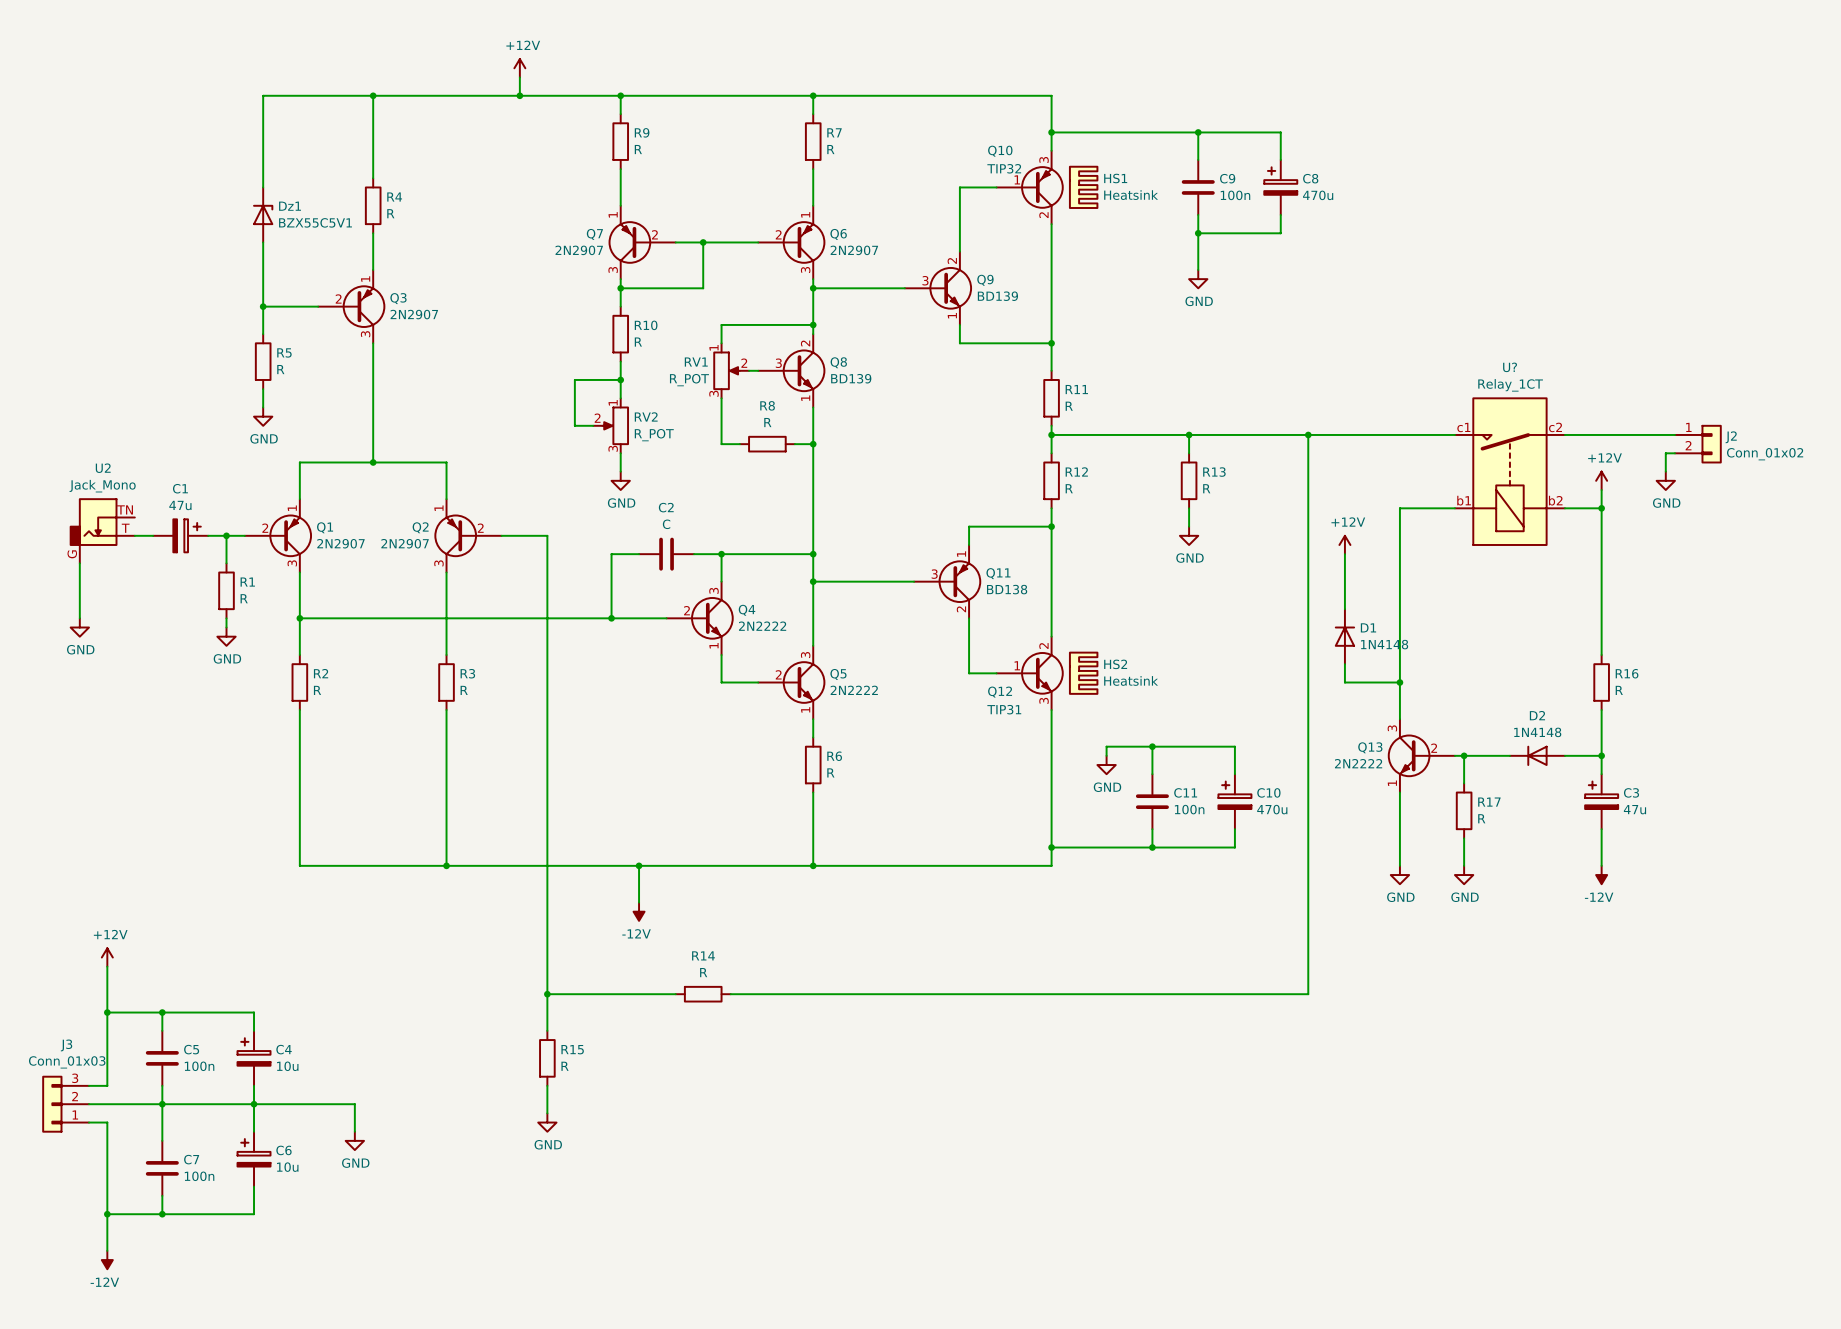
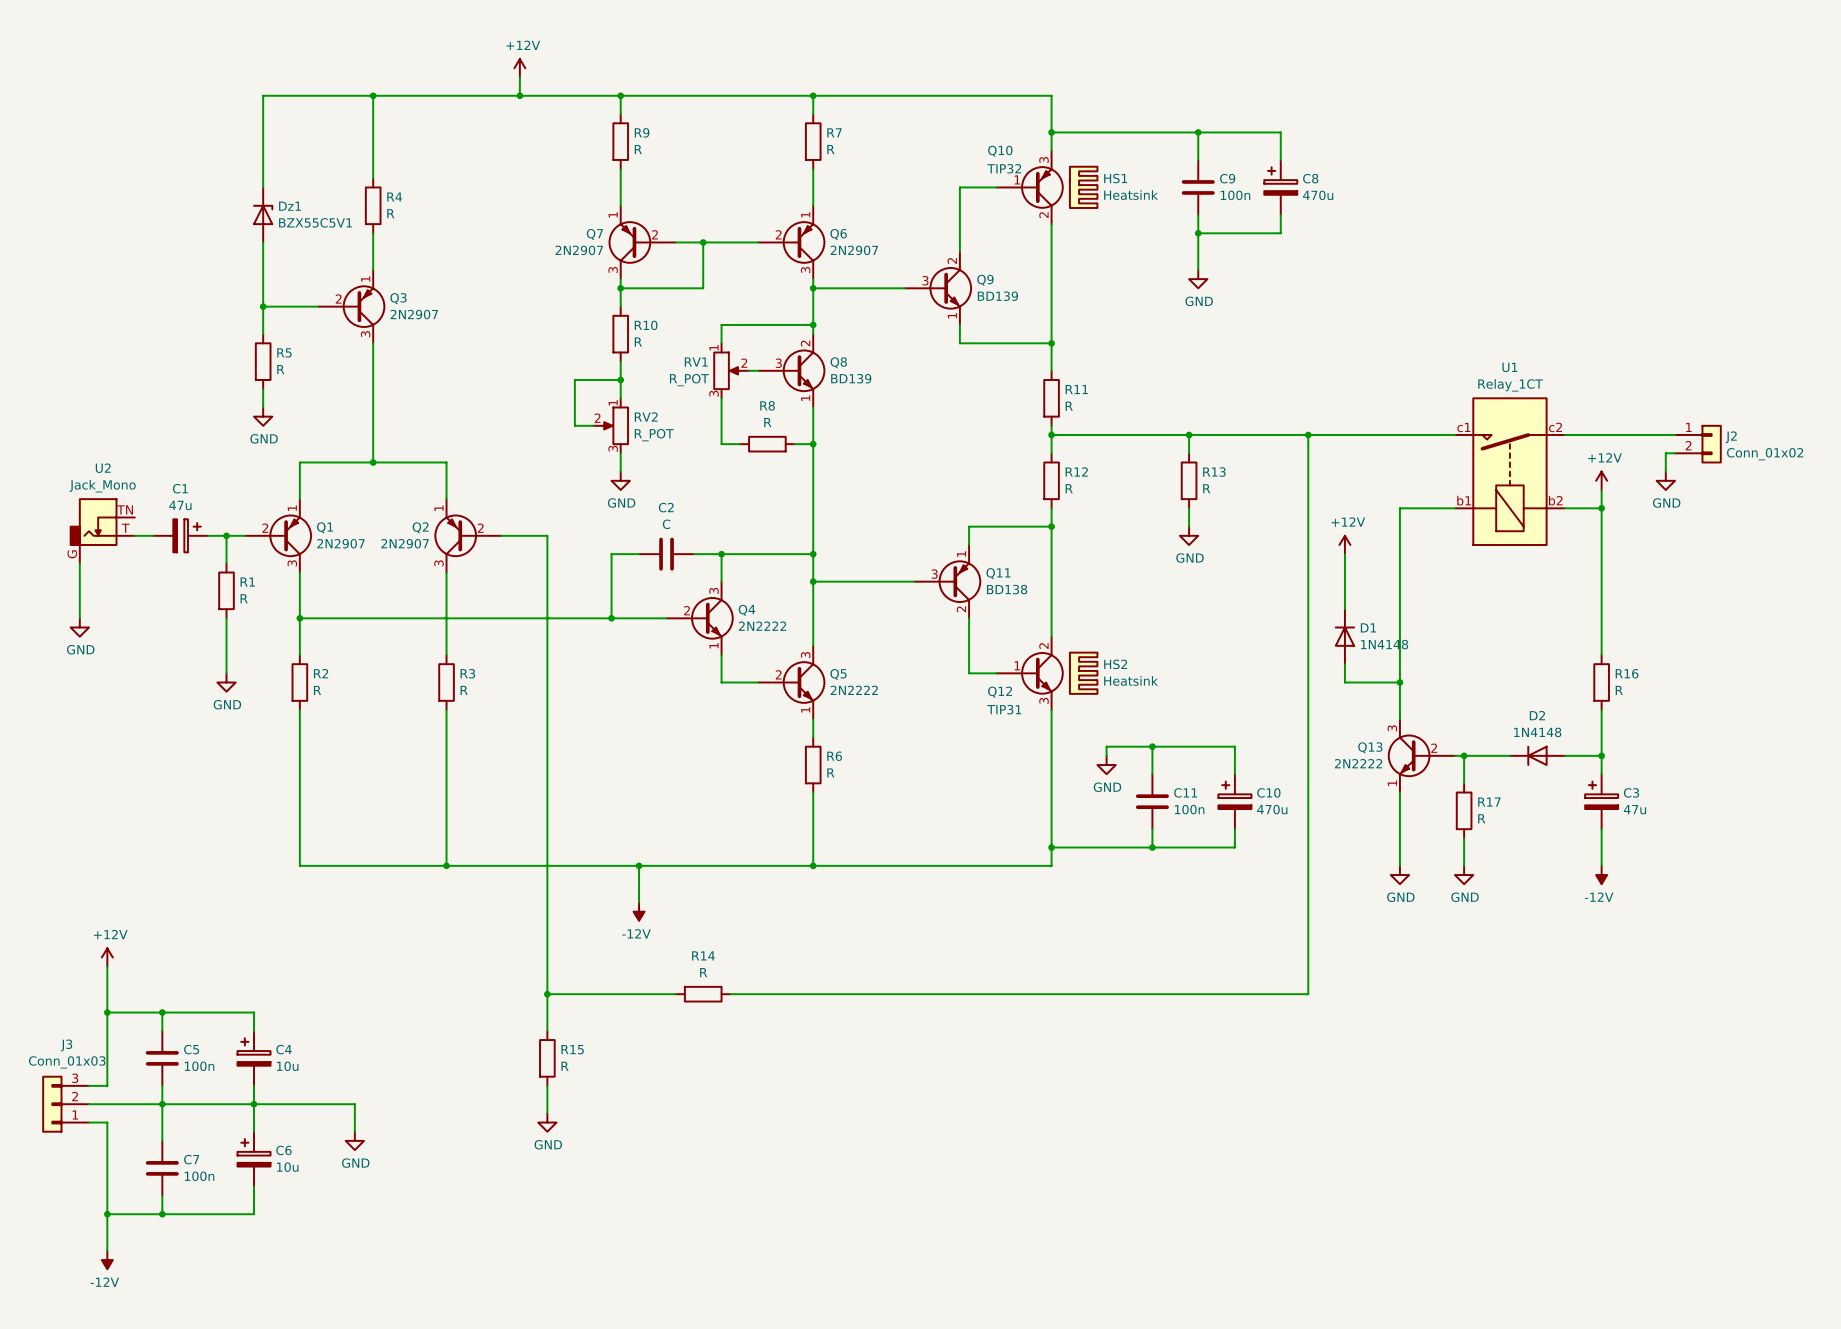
U? name: U? (1510, 367) -> U1 (1509, 367)
wire: none -> (226, 627) (226, 673)
power symbol position: GND (226, 636) -> GND (226, 682)

